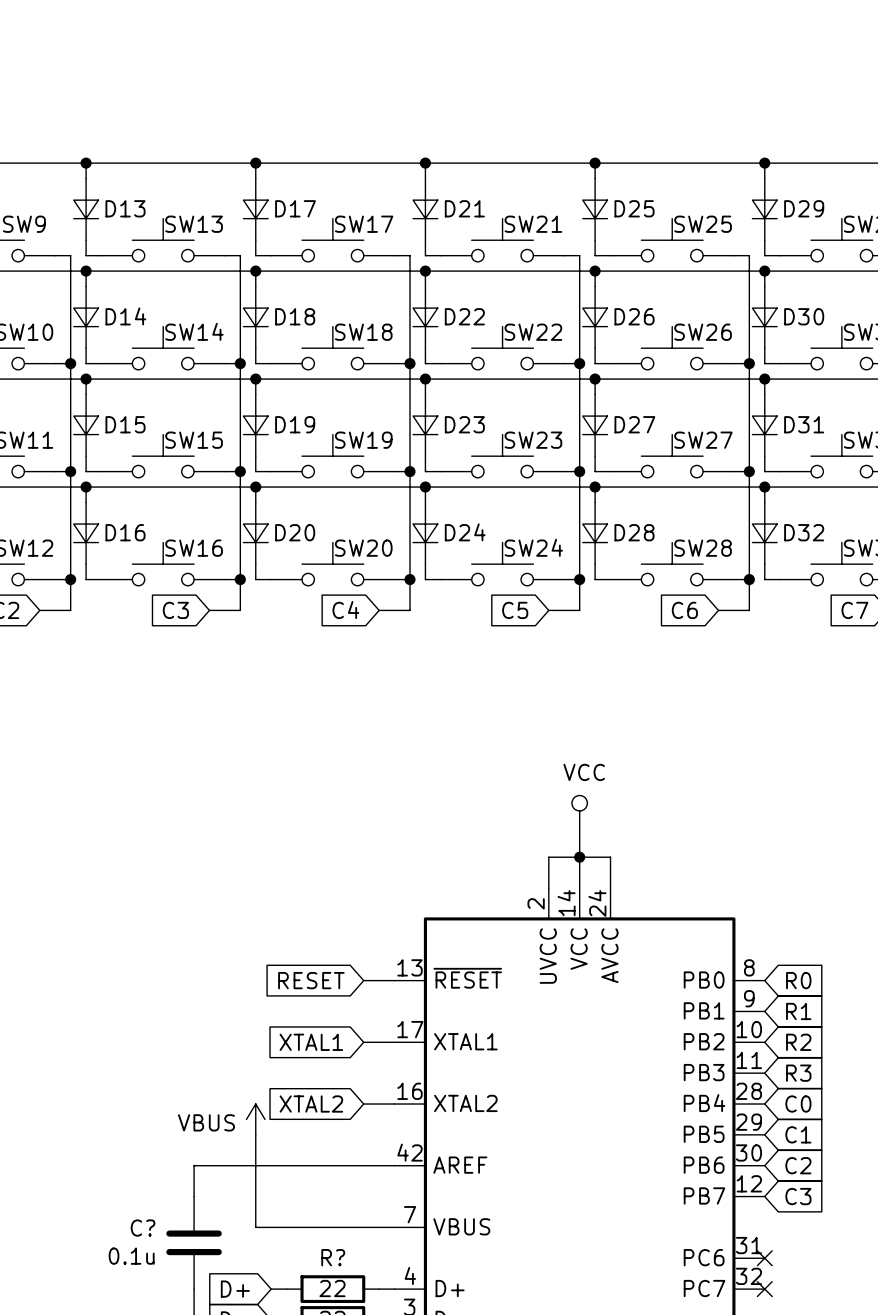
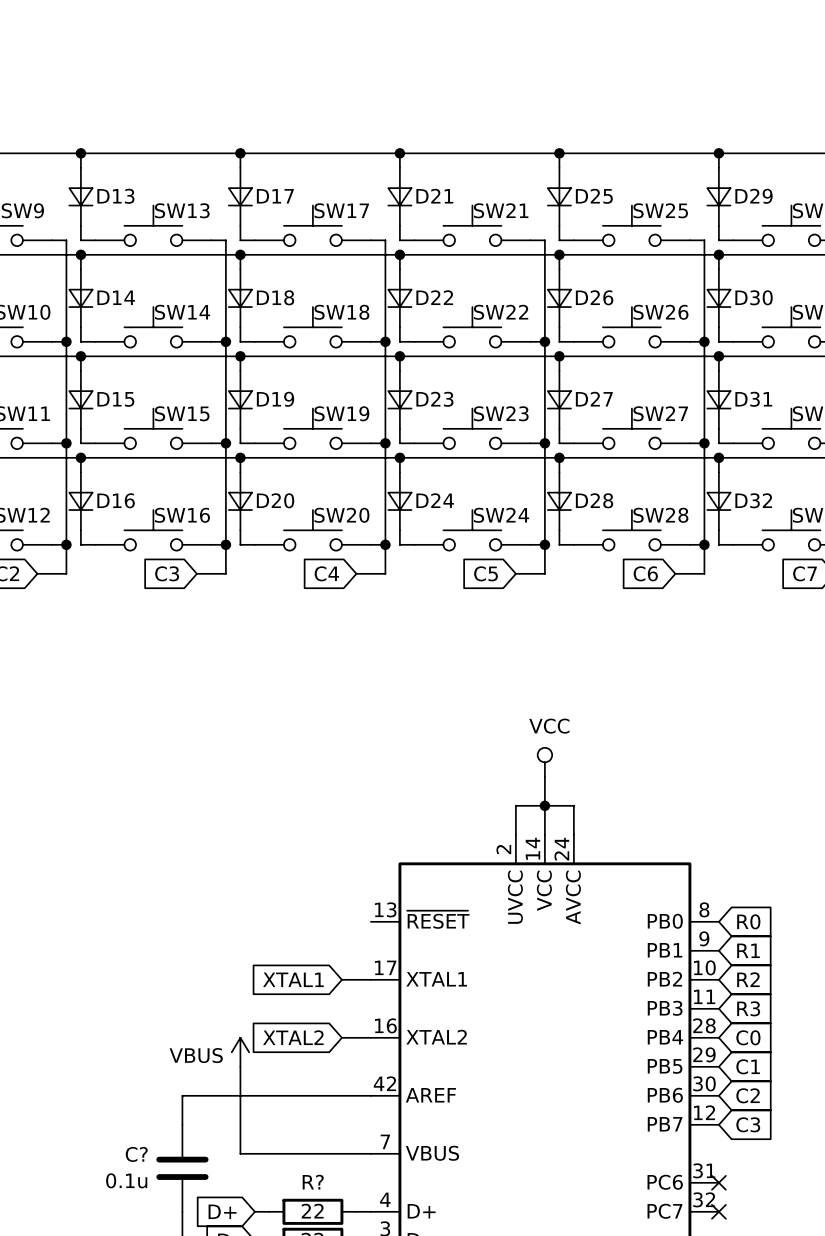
global label: RESET (311, 980) -> none
wire: (363, 980) (394, 980) -> none

